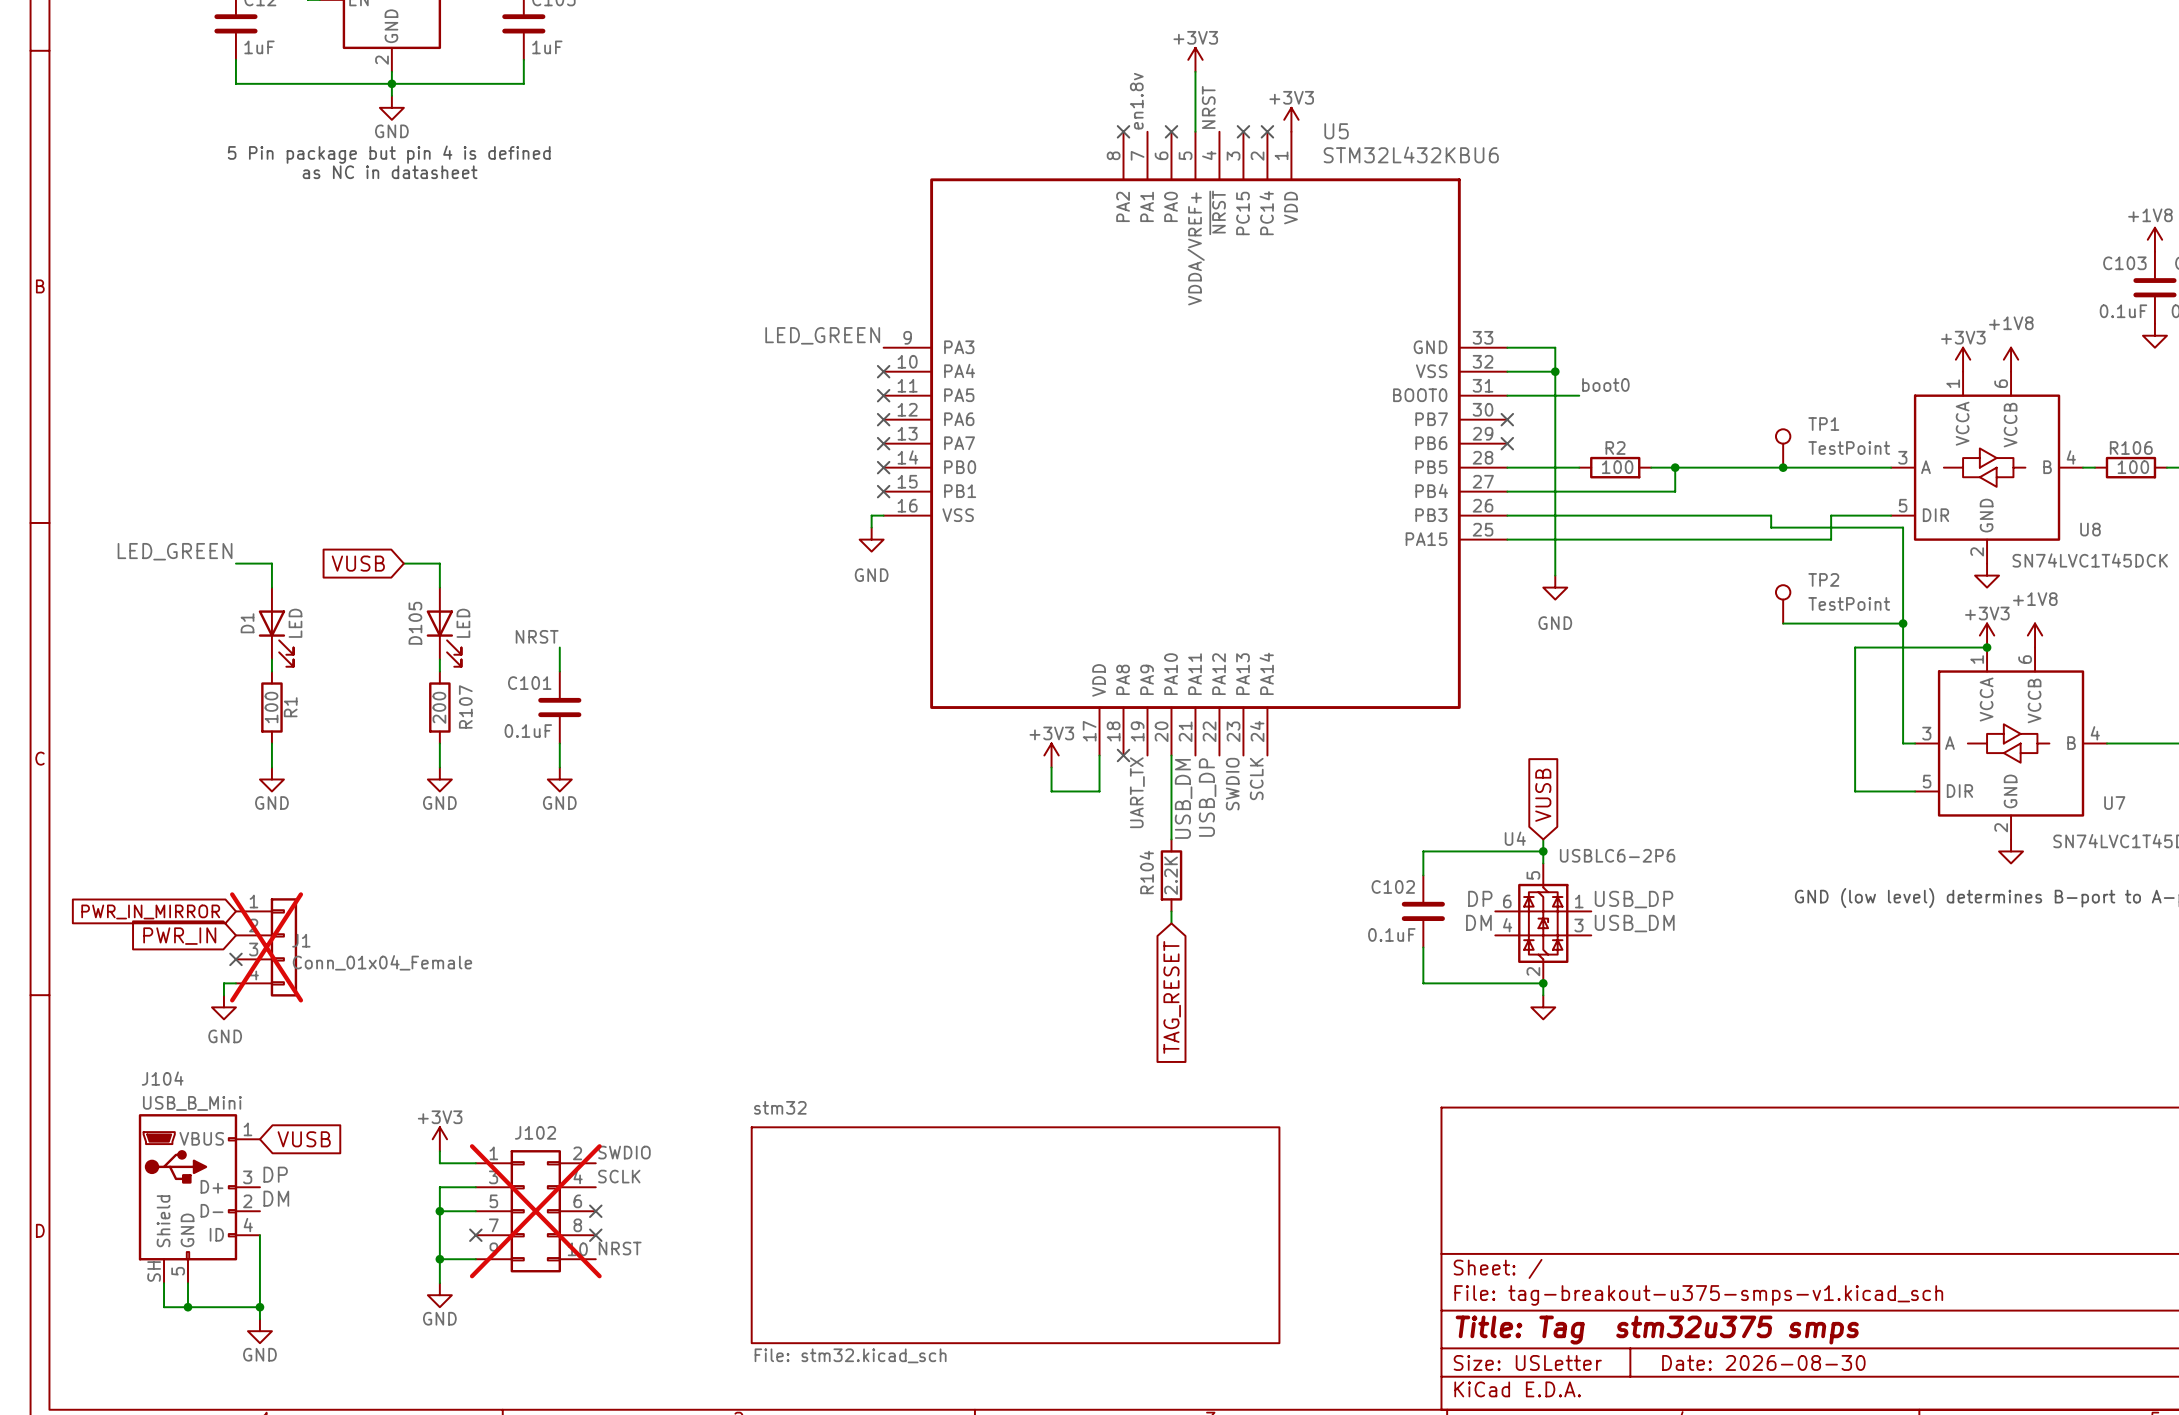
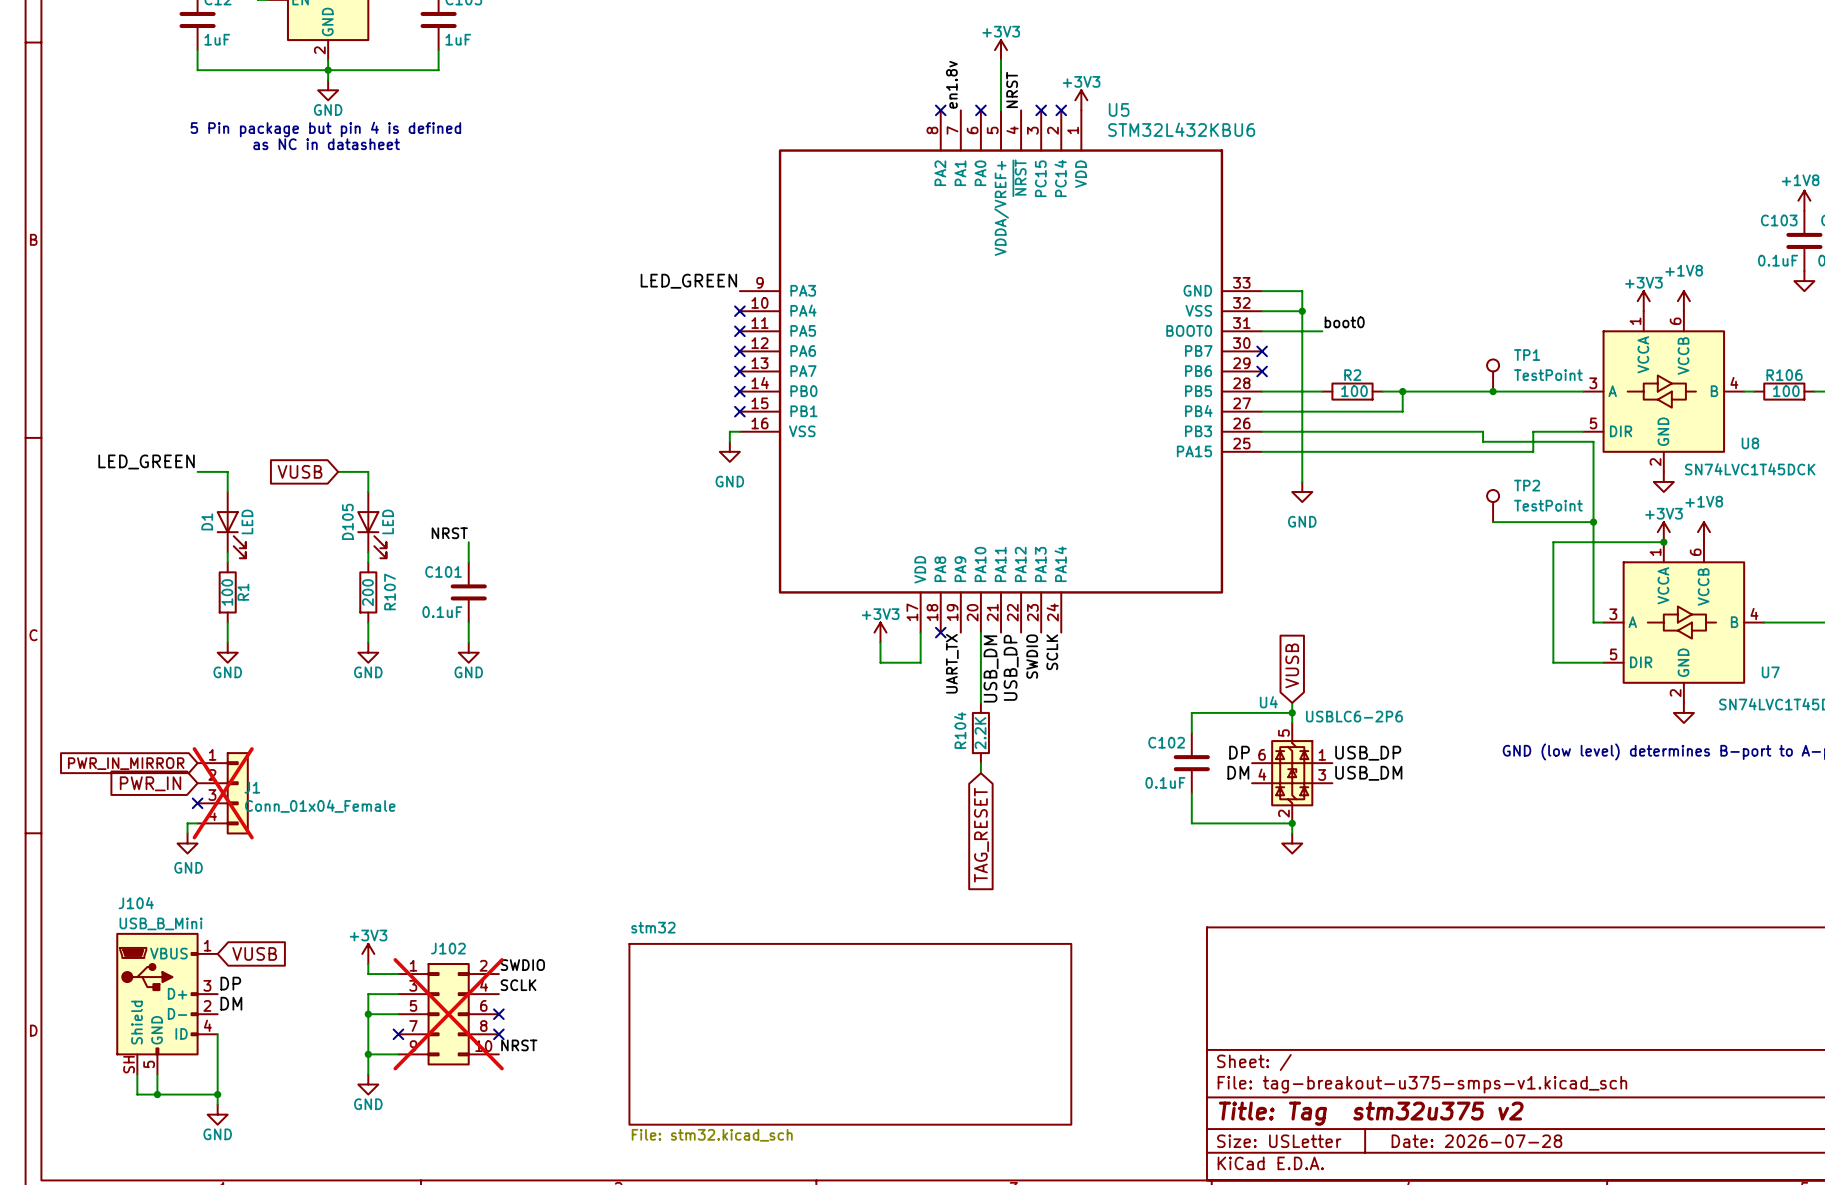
title block: Title: Tag stm32u375 smps (1657, 1330) -> Title: Tag stm32u375 v2 (1371, 1113)
title block: Date: 2026-08-30 (1763, 1362) -> Date: 2026-07-28 (1476, 1141)

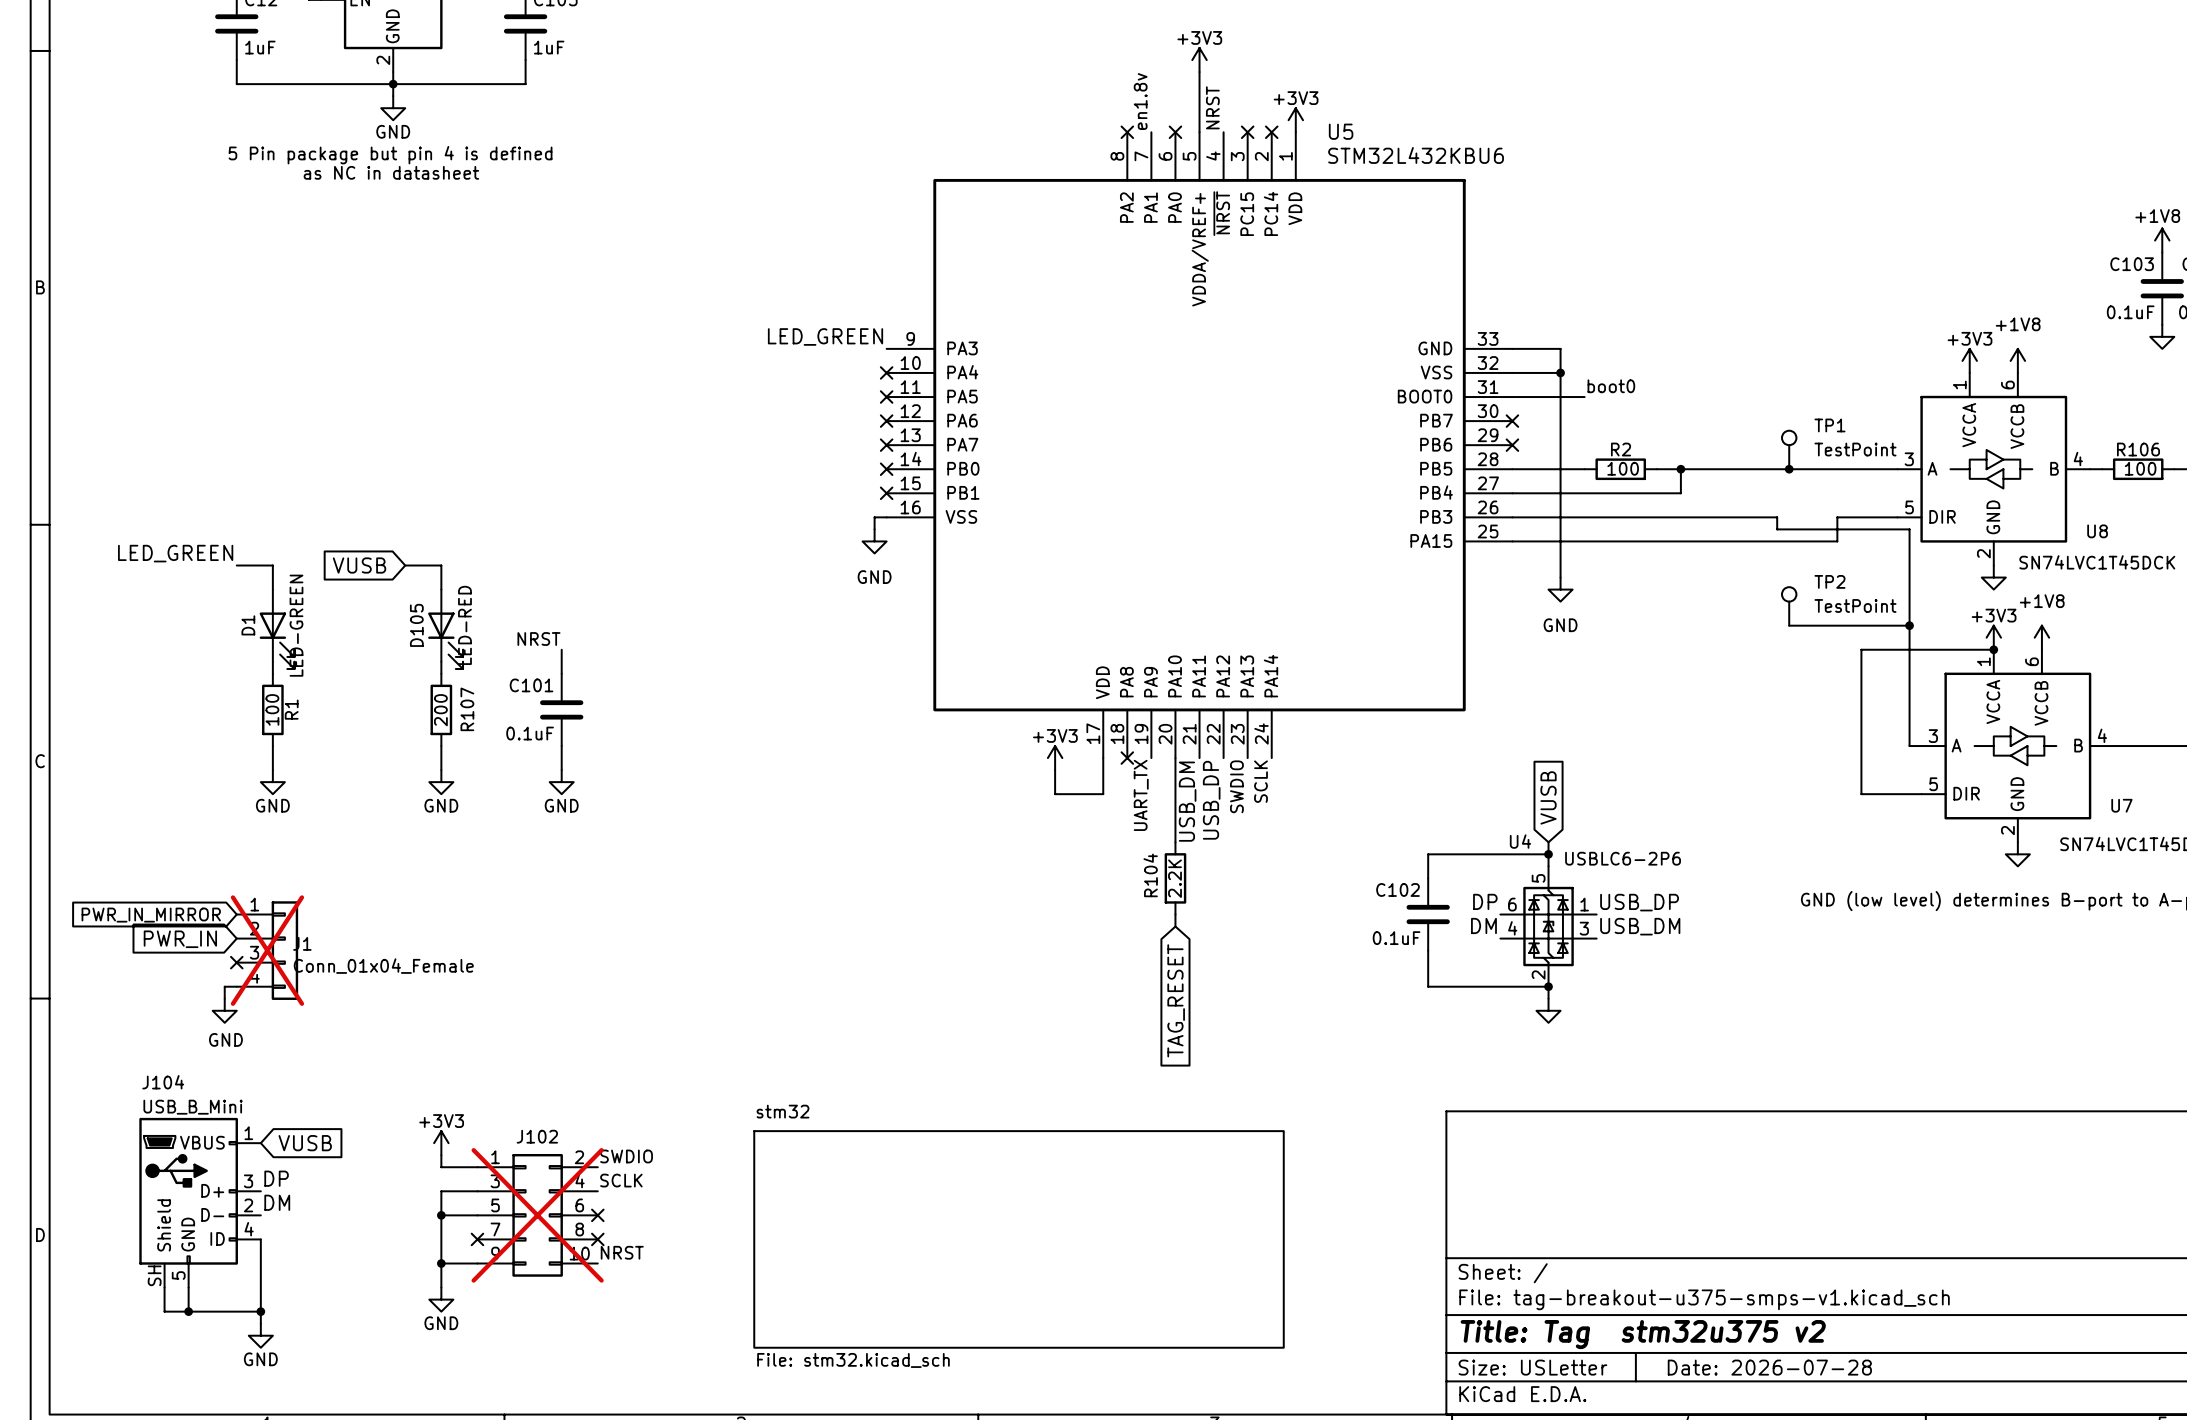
D1 value: LED (247, 521) -> LED-GREEN (296, 625)
D105 value: LED (388, 521) -> LED-RED (464, 625)

